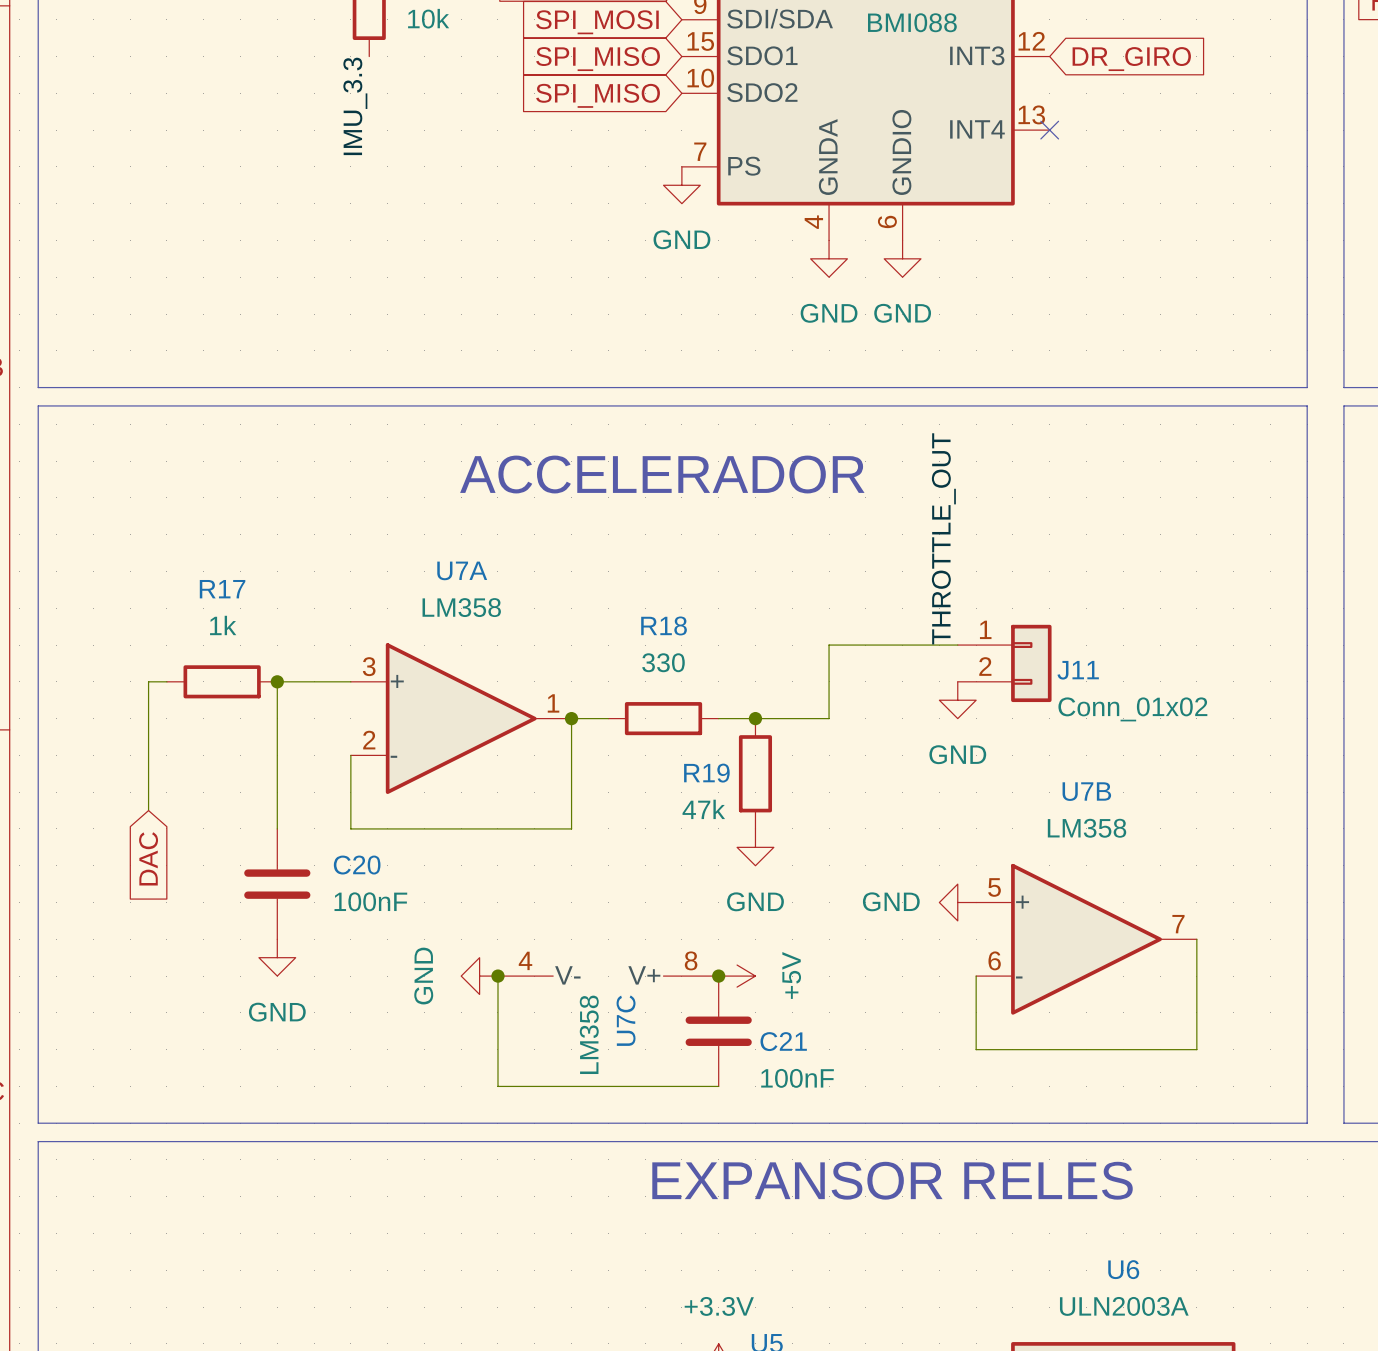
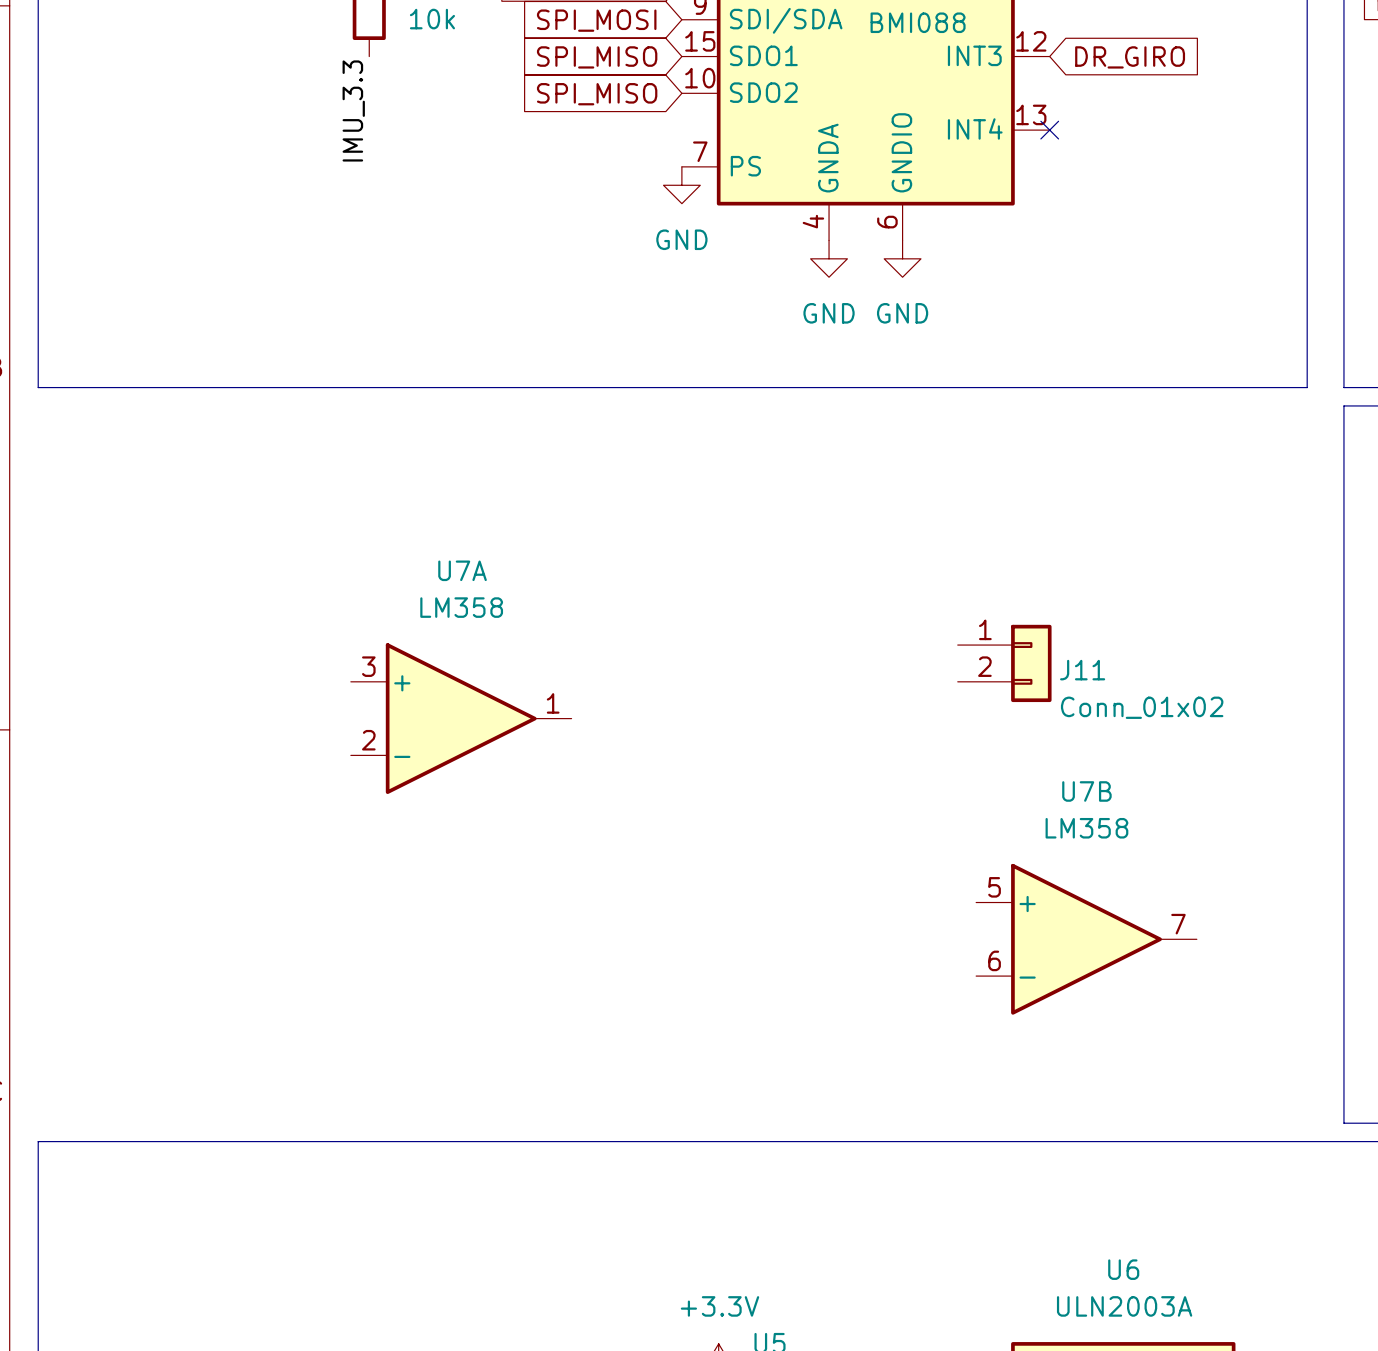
line: (38, 405) (1307, 405) (1307, 1123) (38, 1123) (38, 405) -> none
text: ACCELERADOR (662, 474) -> none
label: THROTTLE_OUT (943, 538) -> none
wire: (957, 645) (829, 645) (829, 718) (718, 718) -> none
wire: (166, 681) (148, 681) (148, 810) -> none
R17: 1k (222, 681) -> none
junction: (277, 681) -> none
wire: (350, 681) (277, 681) (277, 828) -> none
power symbol: GND (957, 700) -> none
junction: (571, 718) -> none
wire: (608, 718) (571, 718) (571, 828) (350, 828) (350, 755) -> none
R18: 330 (663, 718) -> none
junction: (755, 718) -> none
R19: 47k (755, 773) -> none
power symbol: GND (755, 847) -> none
global label: DAC (148, 858) -> none
C20: 100nF (277, 884) -> none
power symbol: GND (957, 902) -> none
wire: (1196, 939) (1196, 1049) (976, 1049) (976, 976) -> none
power symbol: GND (277, 957) -> none
power symbol: GND (479, 976) -> none
wire: (497, 976) (497, 1086) (718, 1086) -> none
junction: (497, 976) -> none
U7C: LM358 (608, 976) -> none
junction: (718, 976) -> none
power symbol: +5V (737, 976) -> none
C21: 100nF (718, 1031) -> none
text: EXPANSOR RELES (892, 1180) -> none

